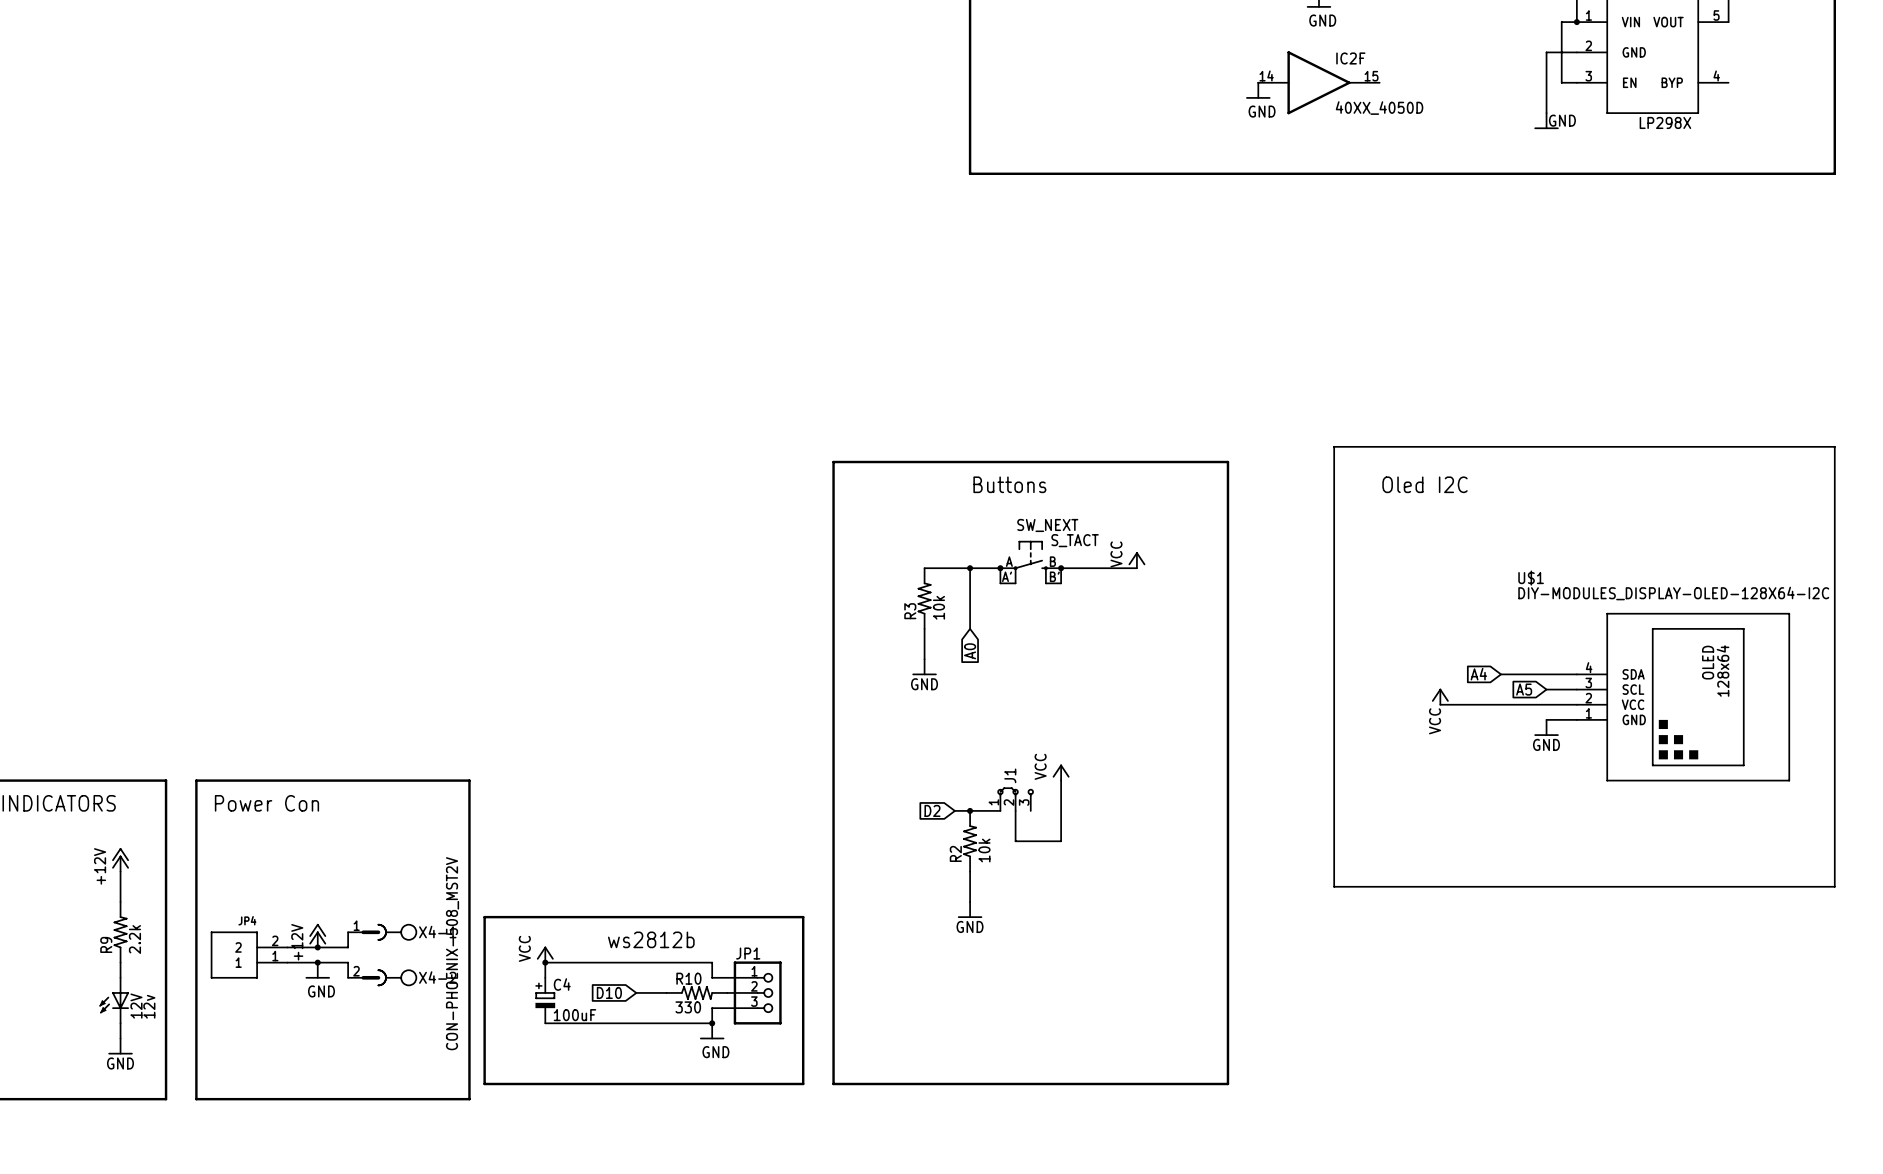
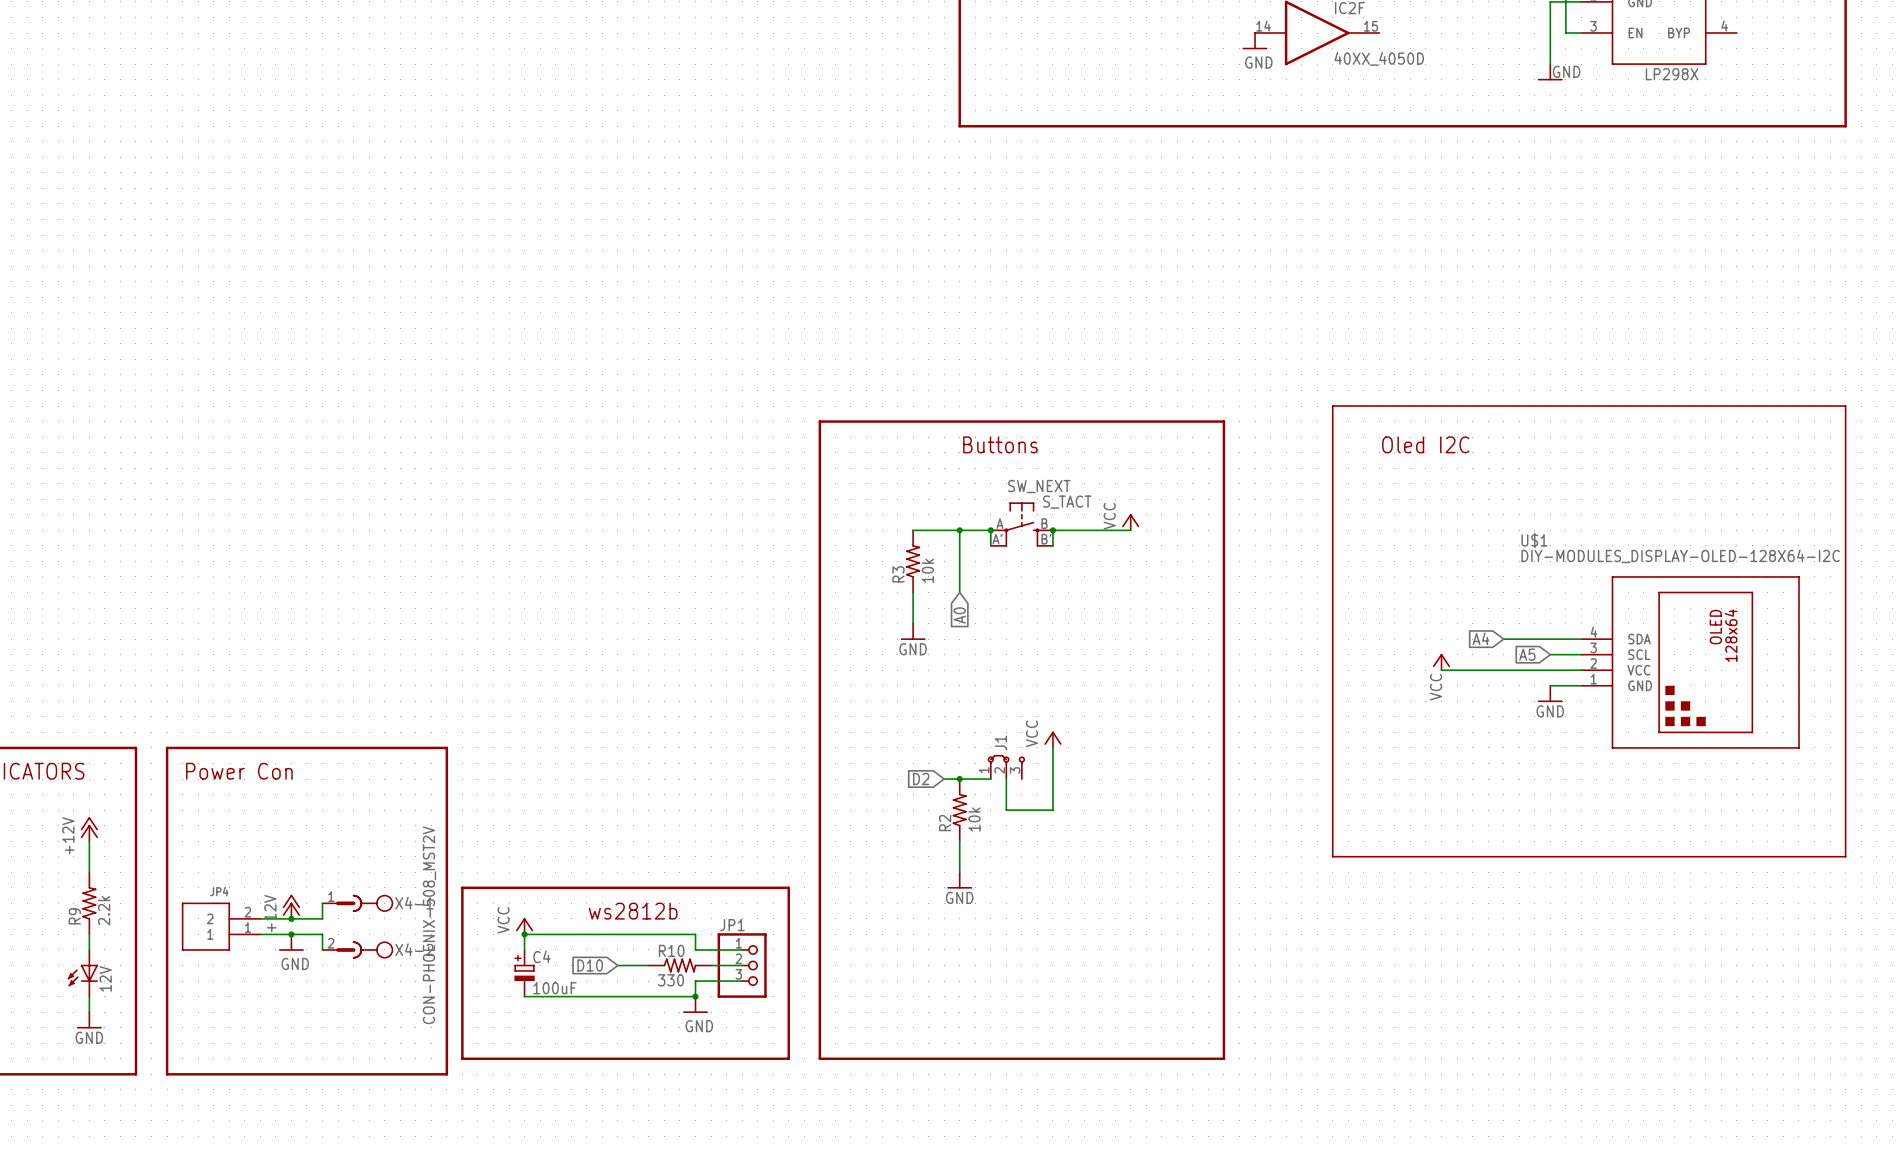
12V value: 12v (149, 1006) -> none

